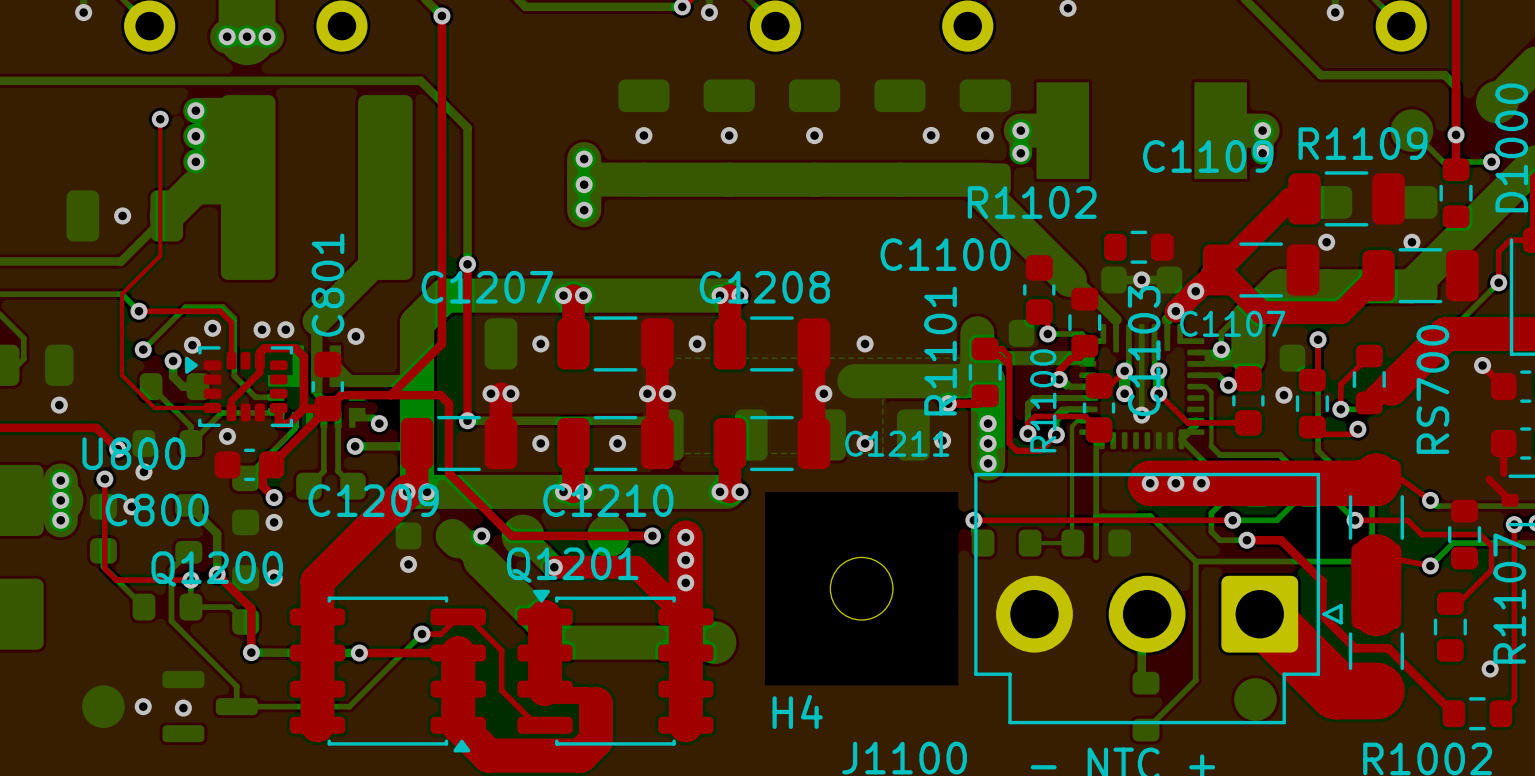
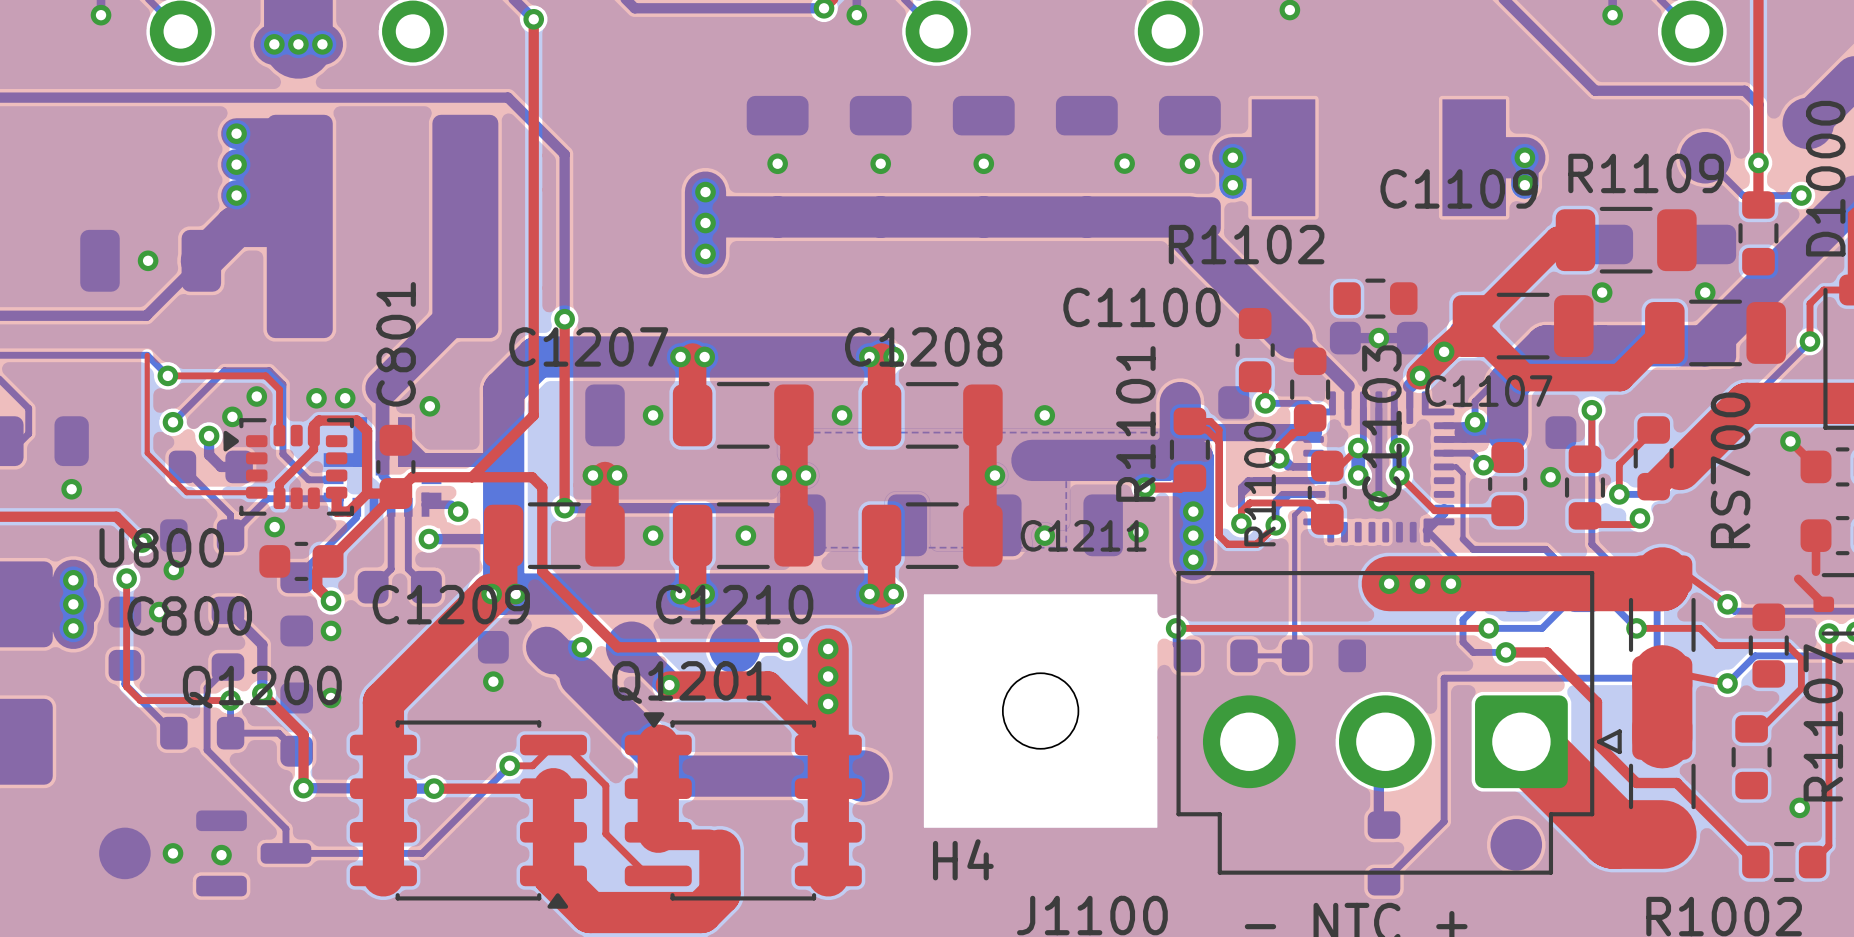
top track: (160, 119) (160, 255) (121, 294) -> none
via: (160, 119) -> none
bottom track: (1089, 432) (1096, 439) (1096, 557) -> none
bottom track: (1096, 516) (1150, 516) (1195, 561) -> none

